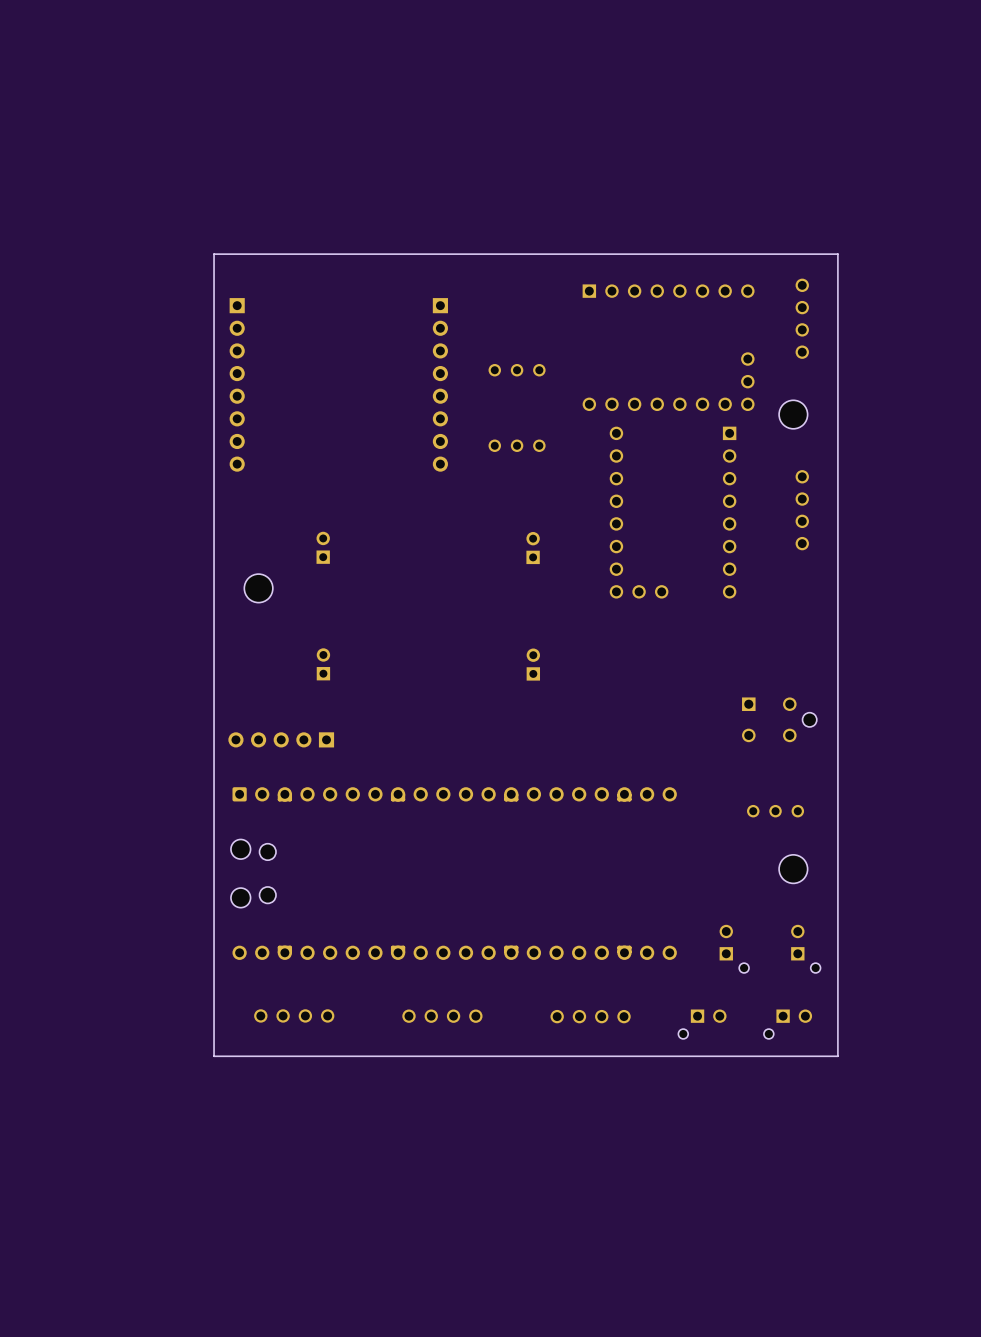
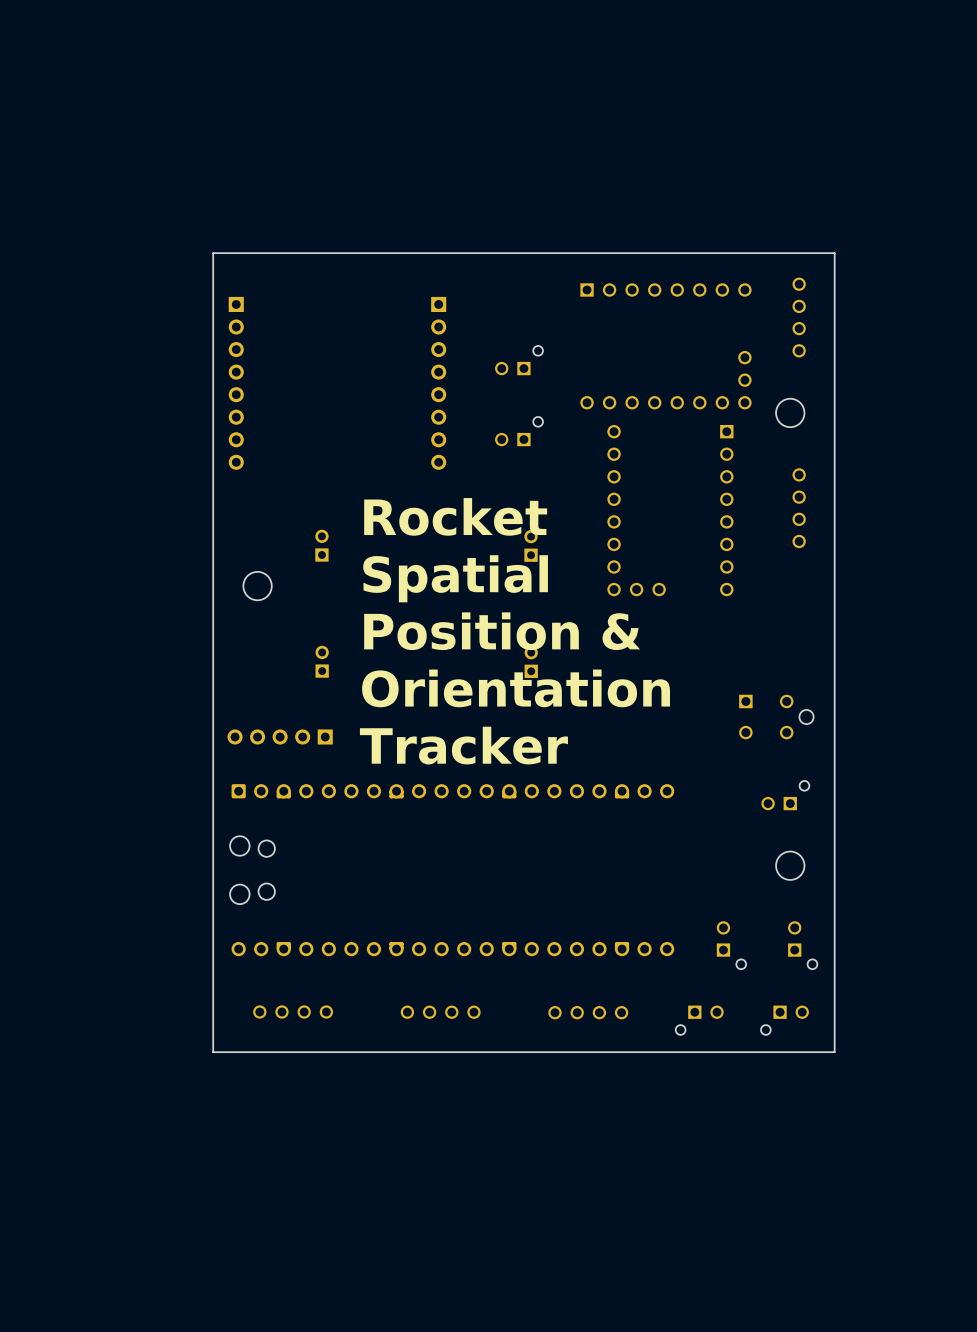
part: none -> (519, 360)
part: (517, 370) -> none
part: none -> (519, 431)
part: (517, 445) -> none
text: none -> Rocket (455, 516)
text: none -> Spatial (455, 578)
text: none -> Position & (502, 631)
text: none -> Orientation (516, 688)
text: none -> Tracker (463, 745)
part: none -> (785, 795)
part: (775, 811) -> none

